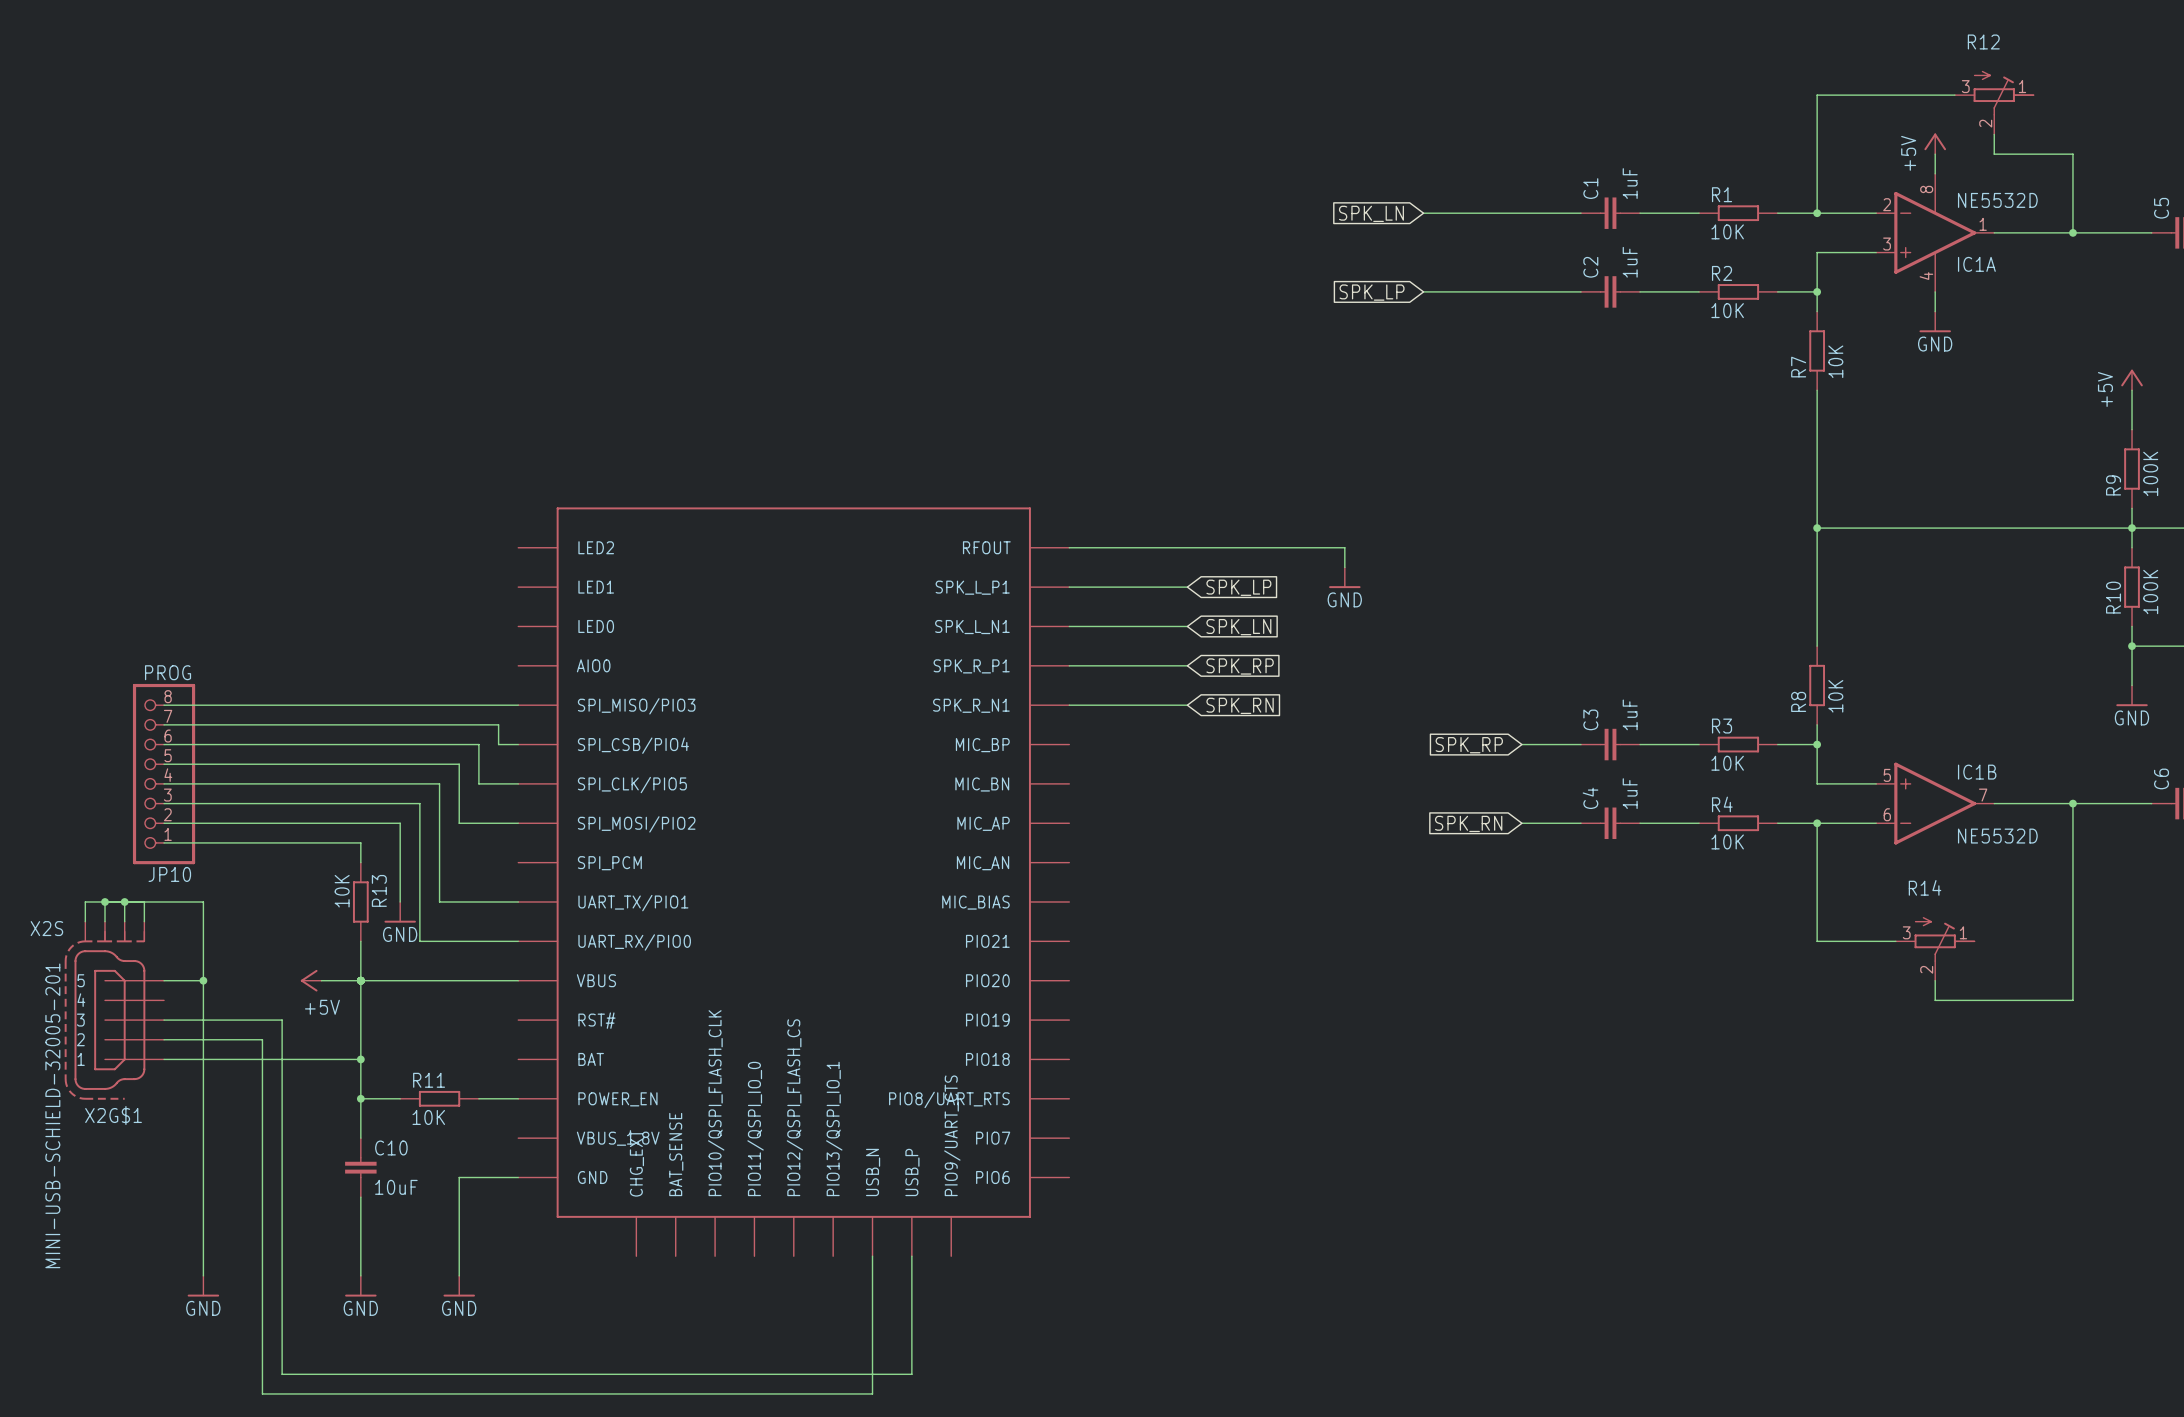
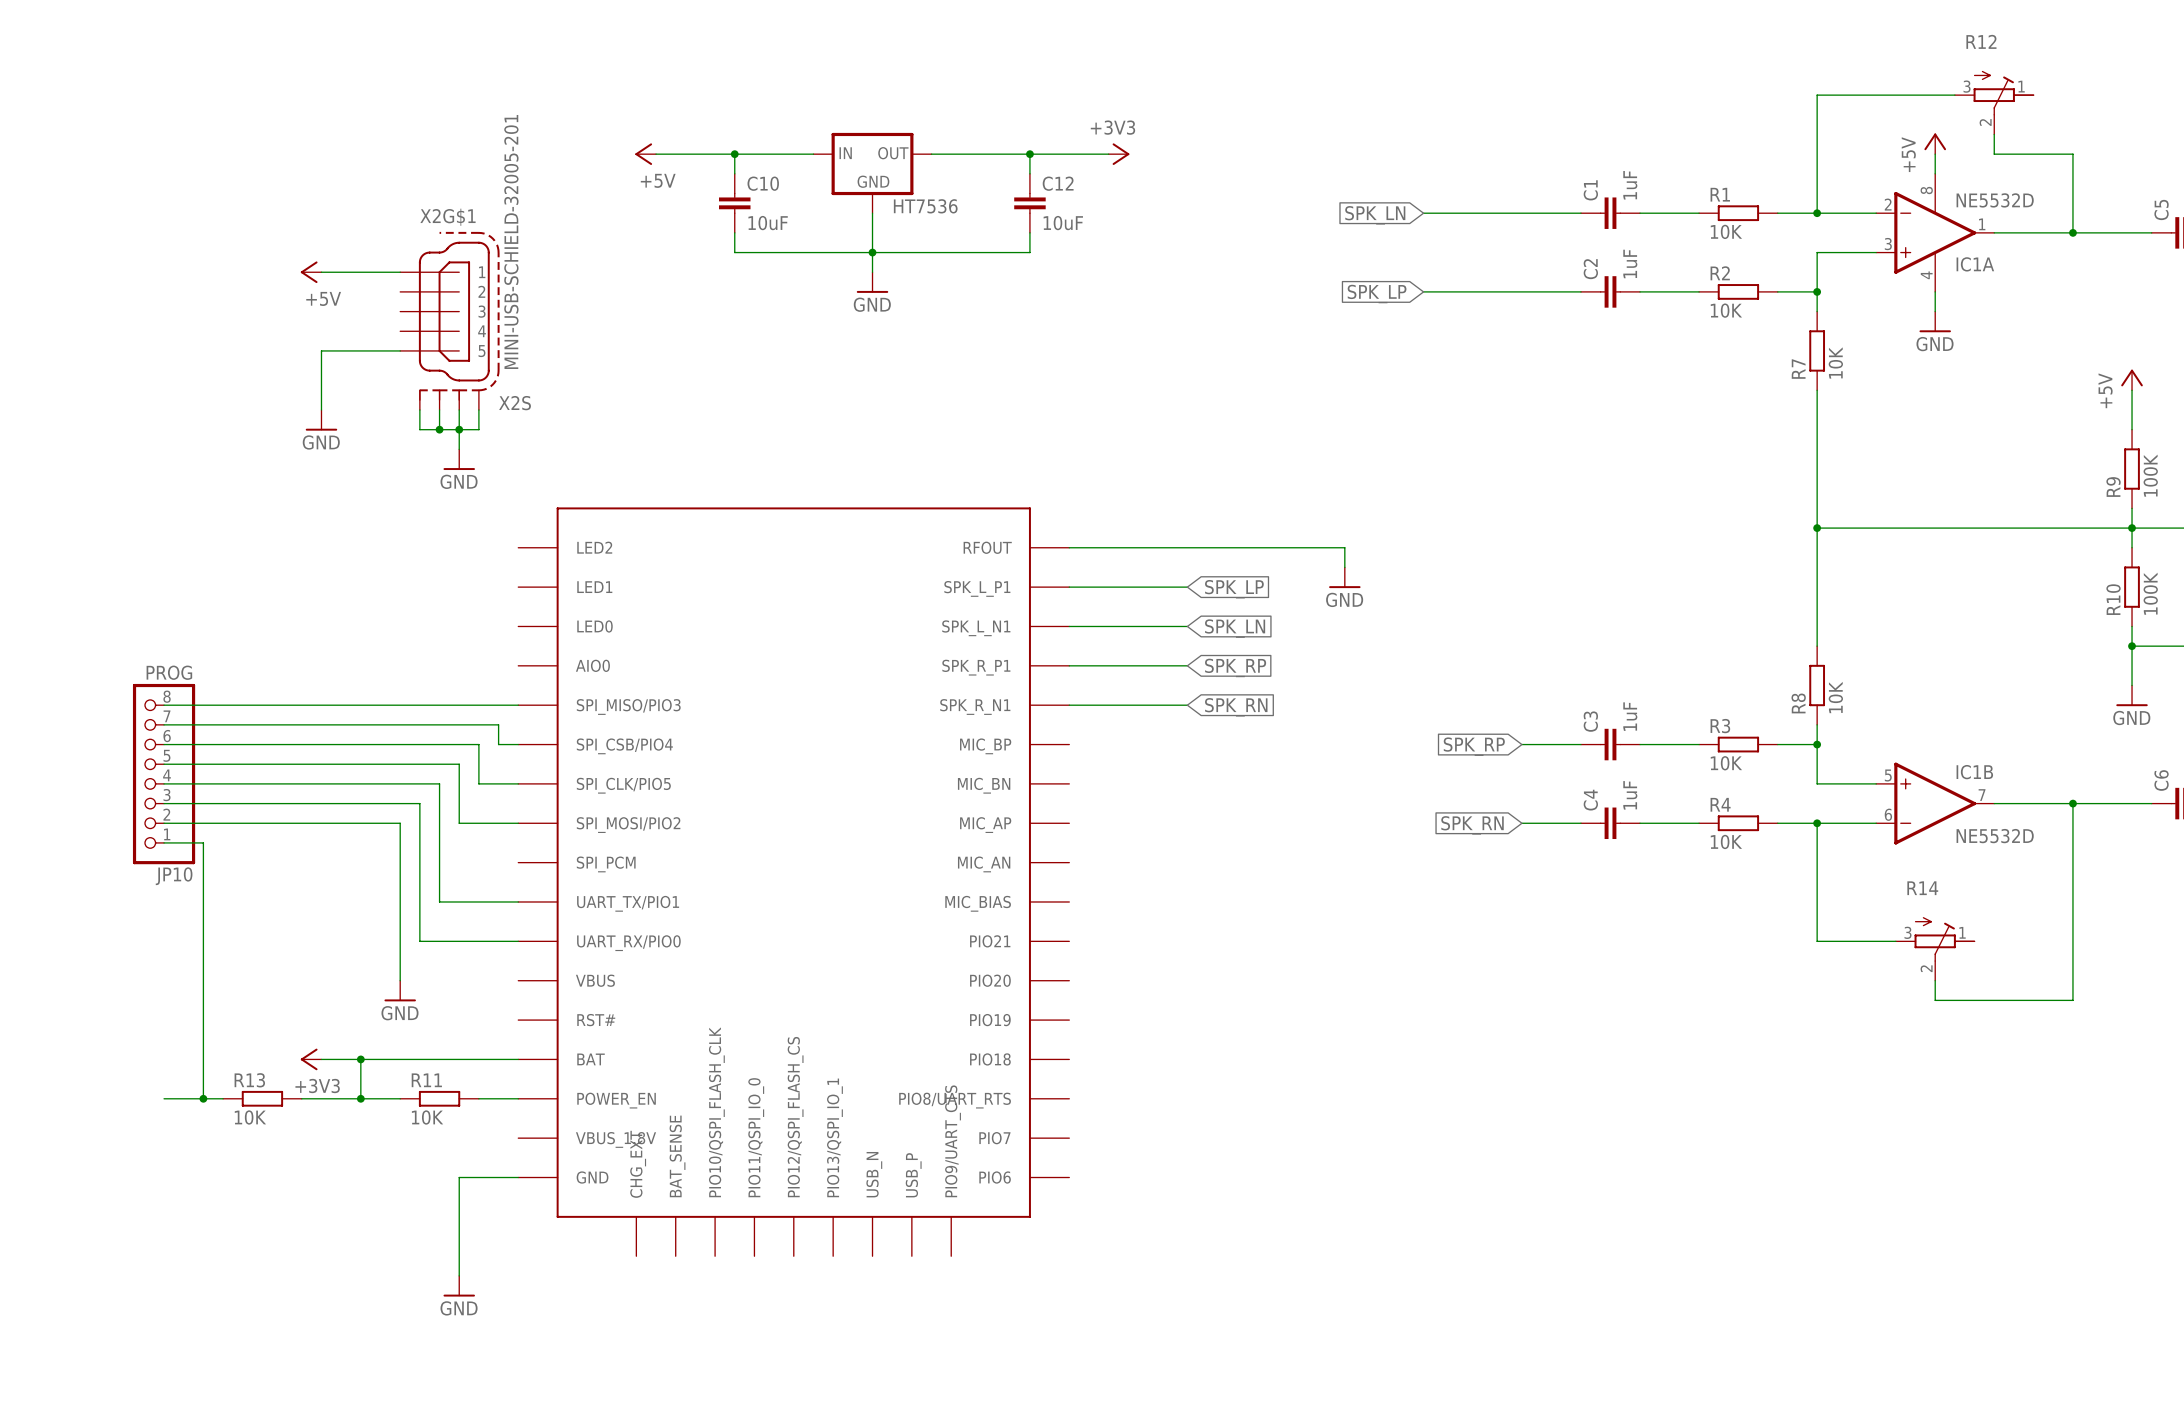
power symbol: none -> +5V (645, 154)
wire: none -> (656, 154) (813, 154)
wire: none -> (734, 154) (734, 173)
junction: none -> (734, 154)
wire: none -> (931, 154) (1108, 154)
wire: none -> (1029, 154) (1029, 173)
junction: none -> (1029, 154)
power symbol: none -> +3V3 (1119, 154)
HT7536: none -> (872, 173)
C12: none -> 10uF (1029, 203)
wire: none -> (872, 213) (872, 272)
wire: none -> (734, 232) (734, 252) (1029, 252) (1029, 232)
junction: none -> (872, 252)
power symbol: none -> +5V (311, 272)
wire: none -> (321, 272) (400, 272)
power symbol: none -> GND (872, 282)
wire: none -> (400, 350) (321, 350) (321, 410)
wire: none -> (419, 410) (419, 429) (478, 429) (478, 410)
wire: none -> (439, 410) (439, 429)
wire: none -> (459, 410) (459, 449)
power symbol: none -> GND (321, 420)
junction: none -> (439, 429)
junction: none -> (459, 429)
power symbol: none -> GND (459, 459)
wire: (203, 842) (360, 842) (360, 862) -> none
R13 name position: R13 (379, 890) -> R13 (249, 1080)
R13 value position: 10K (342, 891) -> 10K (250, 1117)
wire: (105, 901) (105, 921) -> none
junction: (105, 901) -> none
wire: (124, 901) (124, 921) -> none
junction: (124, 901) -> none
wire: (144, 901) (144, 921) -> none
wire: (203, 901) (85, 901) (85, 921) -> (203, 901) (203, 842)
R13 rotation: 0° (360, 901) -> 90° clockwise (262, 1098)
R13 position: (360, 901) -> (262, 1098)
wire: none -> (400, 901) (400, 980)
power symbol position: GND (400, 912) -> GND (400, 991)
wire: (360, 941) (360, 1059) -> (518, 1059) (360, 1059)
wire: (164, 980) (203, 980) -> none
junction: (203, 980) -> none
power symbol: +5V (311, 980) -> none
wire: (321, 980) (518, 980) -> none
junction: (360, 980) -> none
X2S position: (105, 1010) -> (459, 320)
X2S rotation: 0° (105, 1015) -> 180° (459, 316)
X2G$1 rotation: 0° (109, 1020) -> 180° (454, 311)
X2G$1 position: (119, 1020) -> (444, 311)
wire: (164, 1020) (282, 1020) (282, 1374) (911, 1374) (911, 1256) -> none
wire: (164, 1039) (262, 1039) (262, 1393) (872, 1393) (872, 1256) -> none
wire: (164, 1059) (321, 1059) -> none
power symbol: none -> +3V3 (311, 1059)
wire: none -> (164, 1098) (223, 1098)
wire: (203, 1098) (203, 1275) -> none
junction: none -> (203, 1098)
wire: (360, 1098) (360, 1138) -> (360, 1098) (301, 1098)
C10 position: (360, 1167) -> (734, 203)
wire: (360, 1197) (360, 1275) -> none
power symbol: GND (203, 1286) -> none
power symbol: GND (360, 1286) -> none

